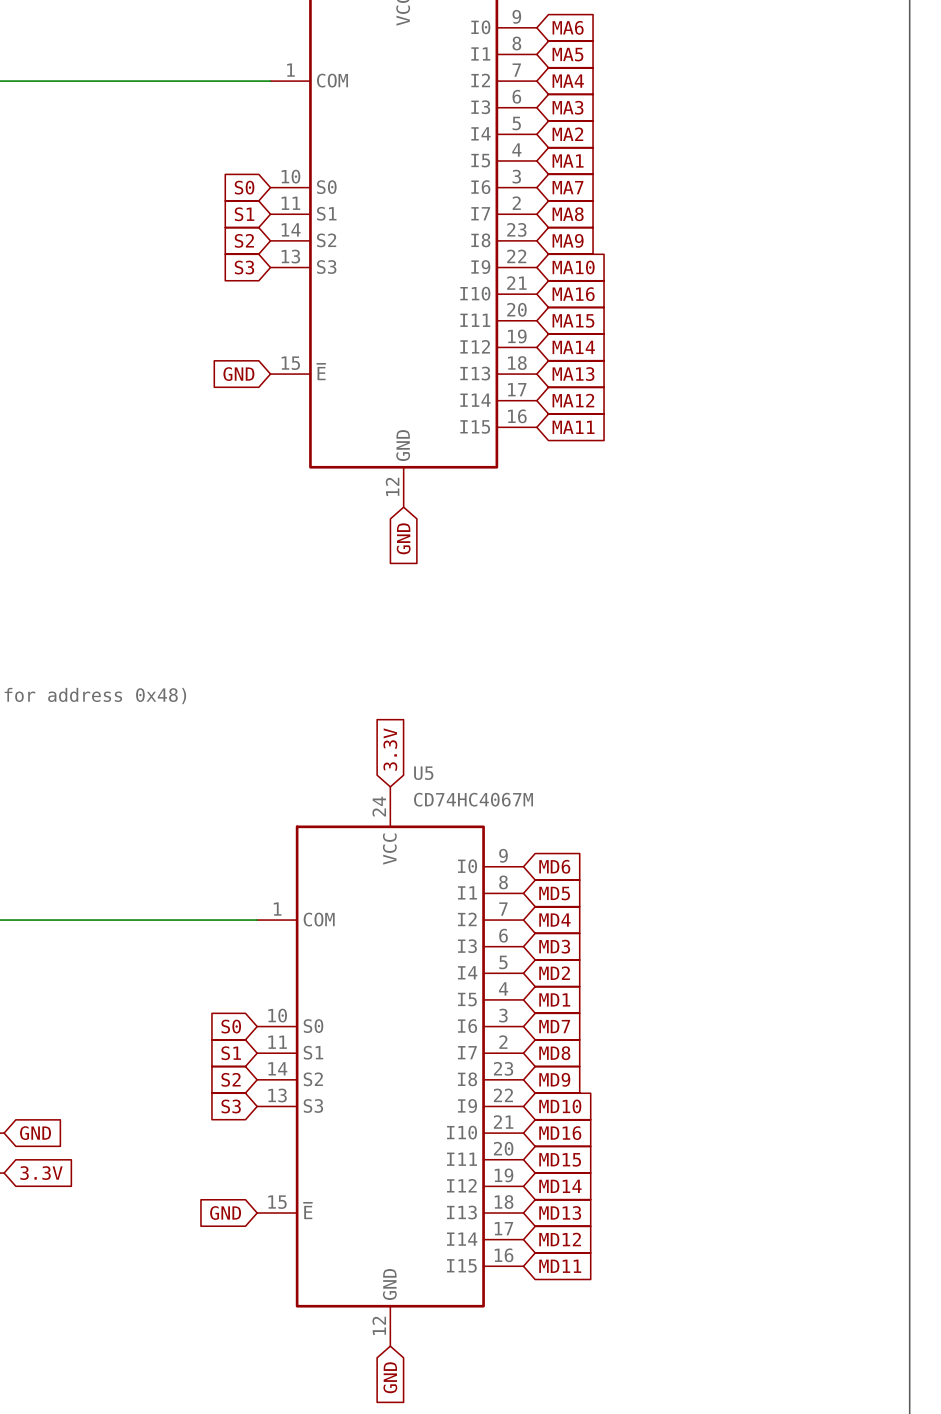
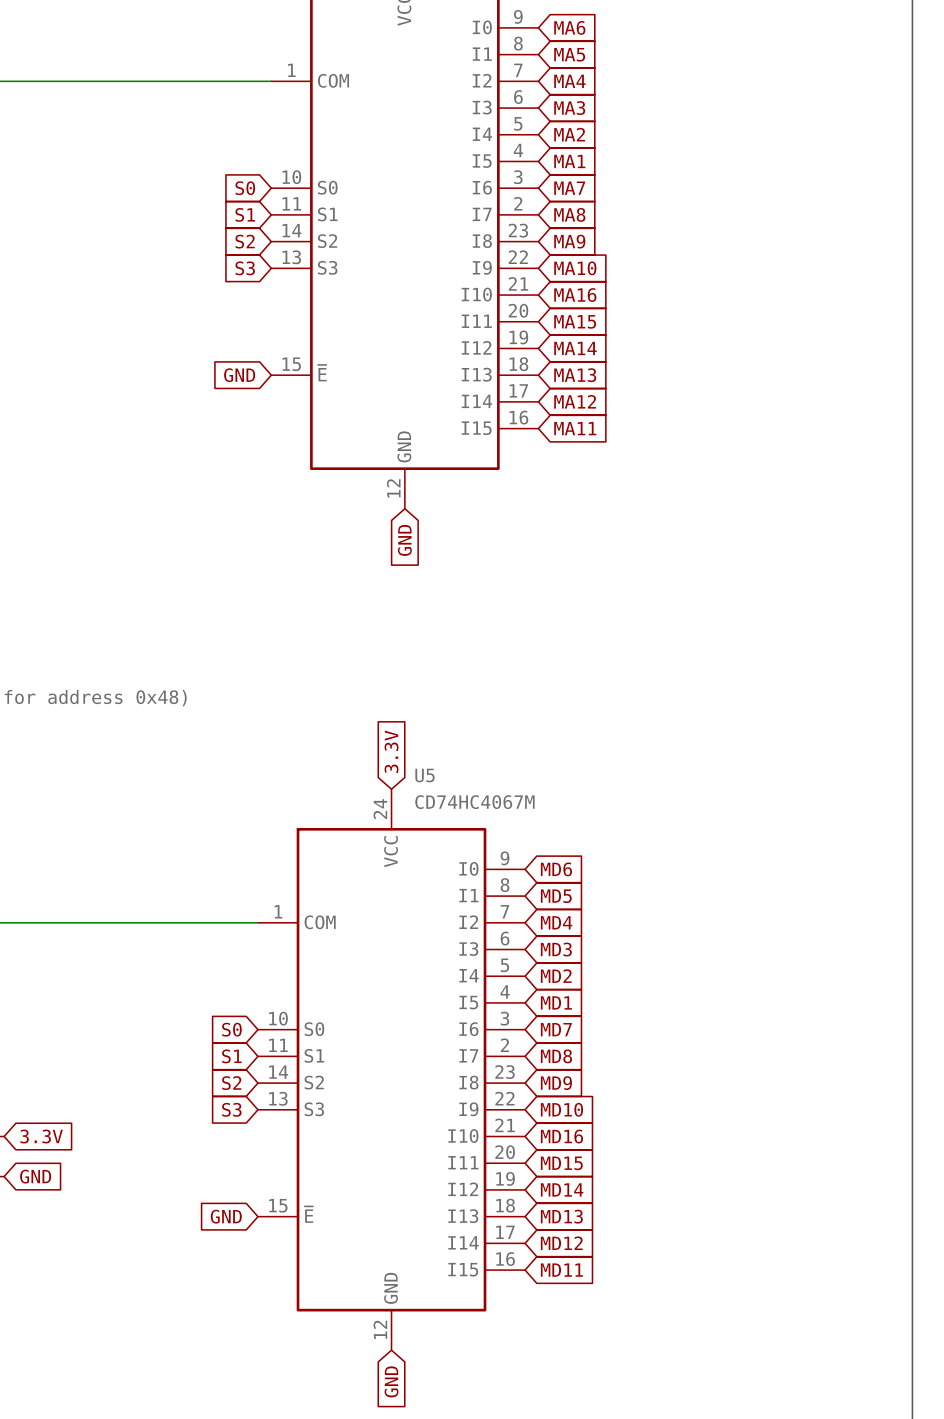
global label: GND (35, 1133) -> 3.3V (41, 1136)
global label: 3.3V (41, 1173) -> GND (35, 1176)

